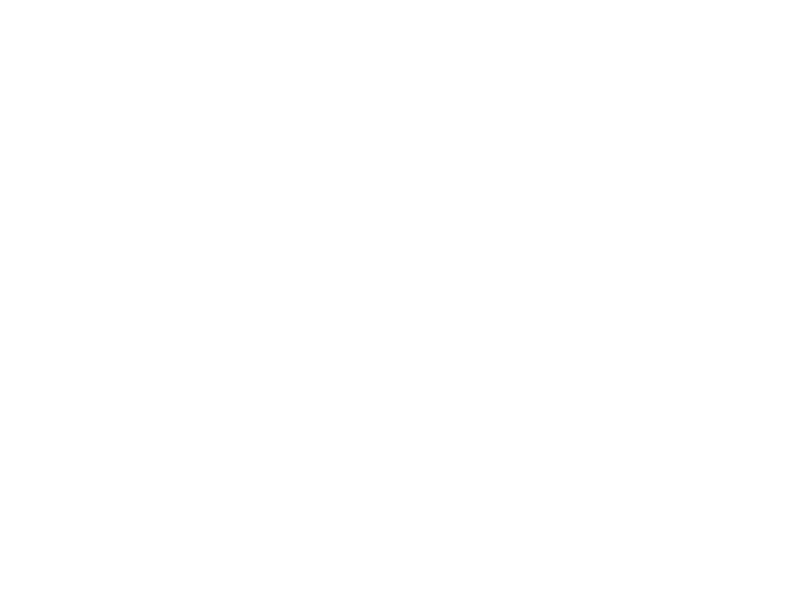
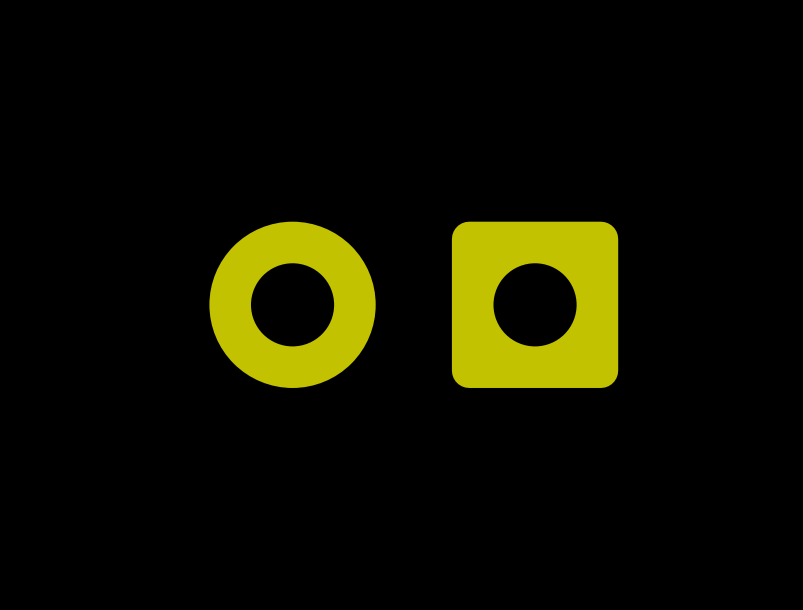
part: none -> (413, 304)

